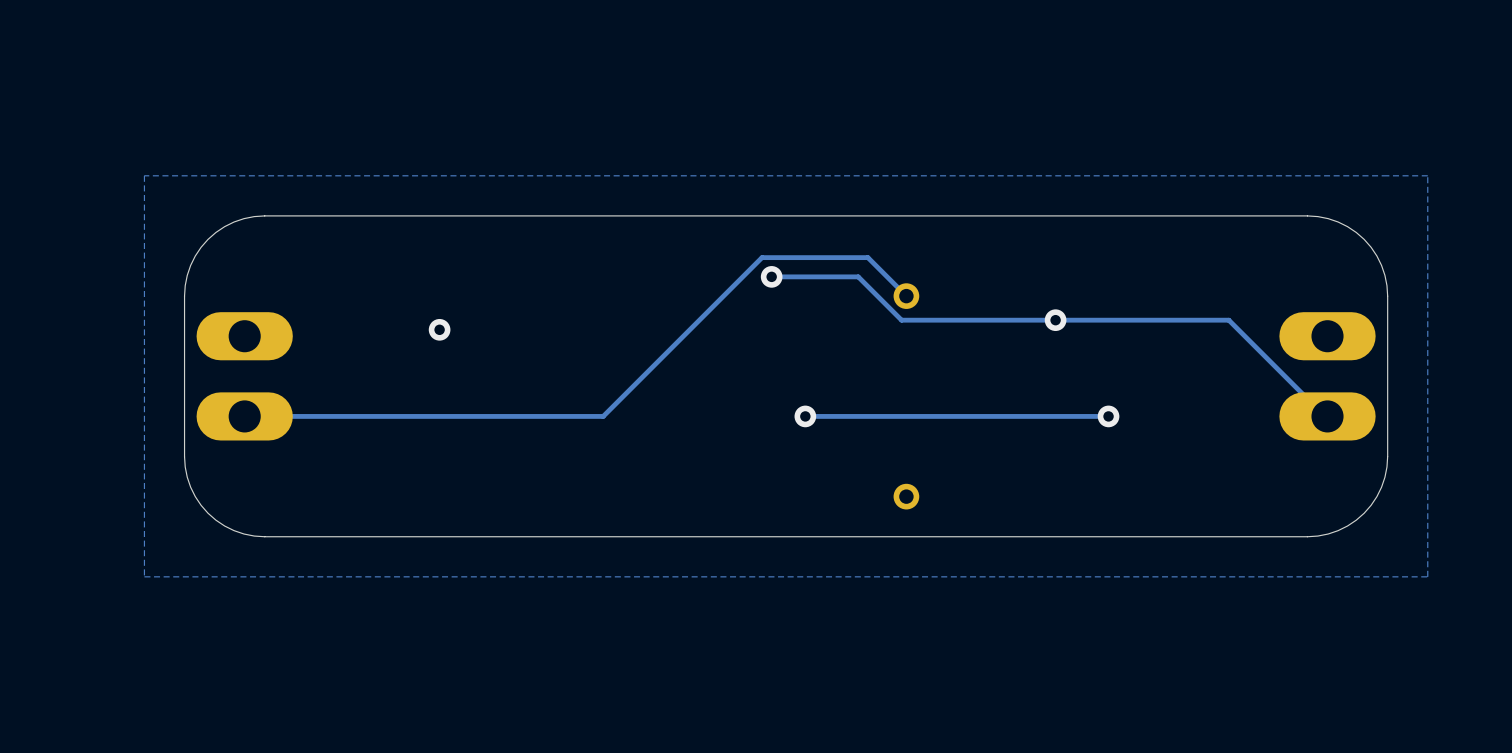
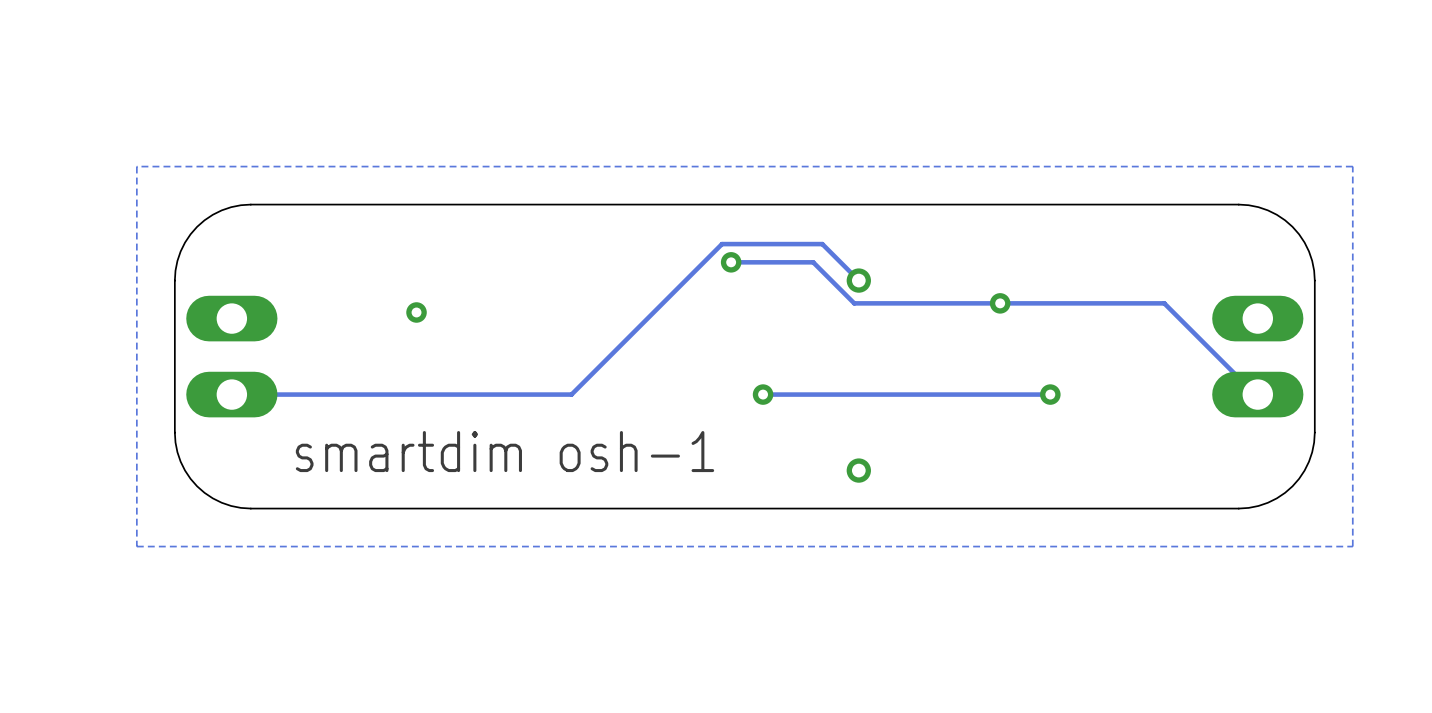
text: none -> smartdim osh-1 (504, 451)

